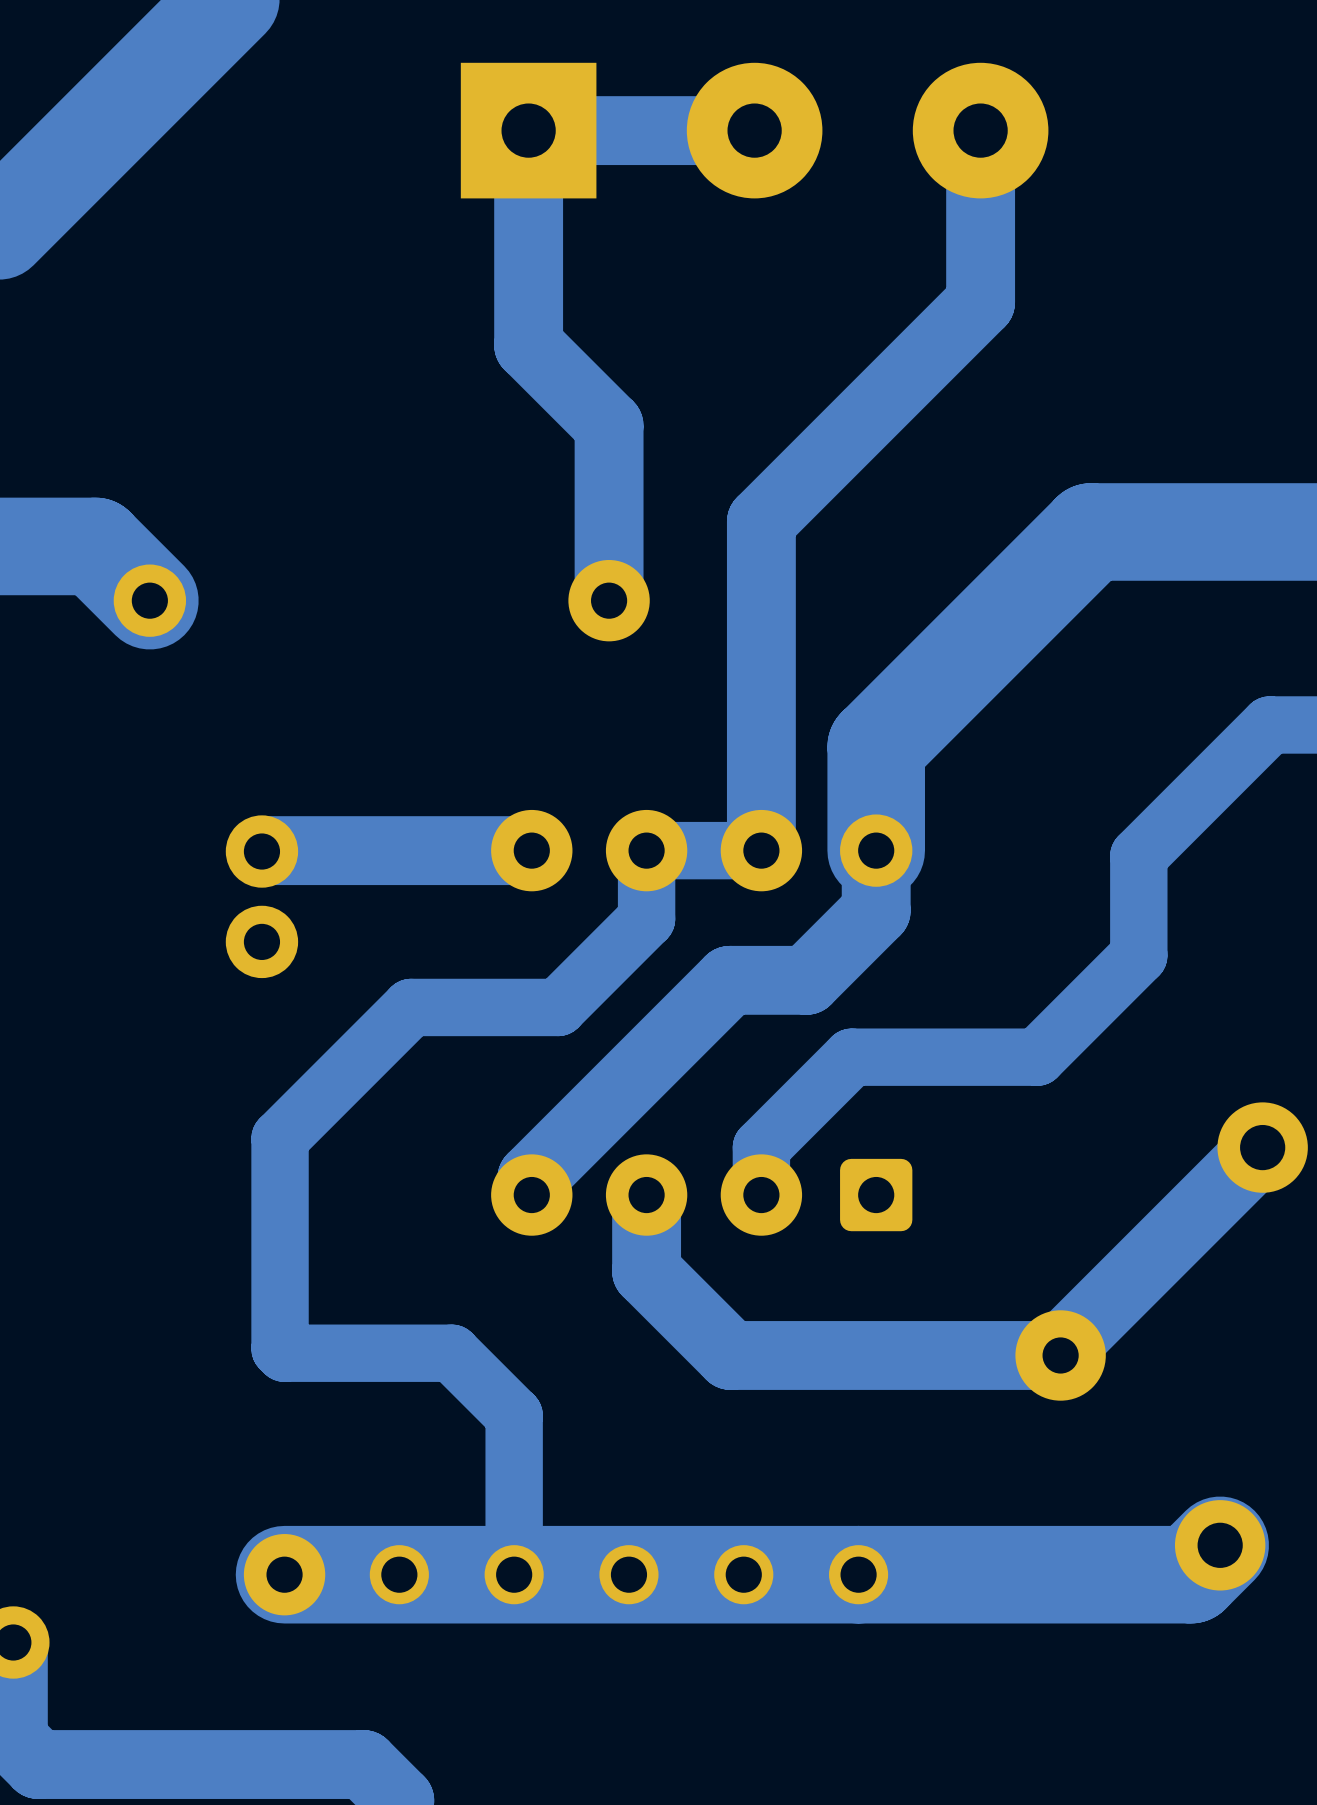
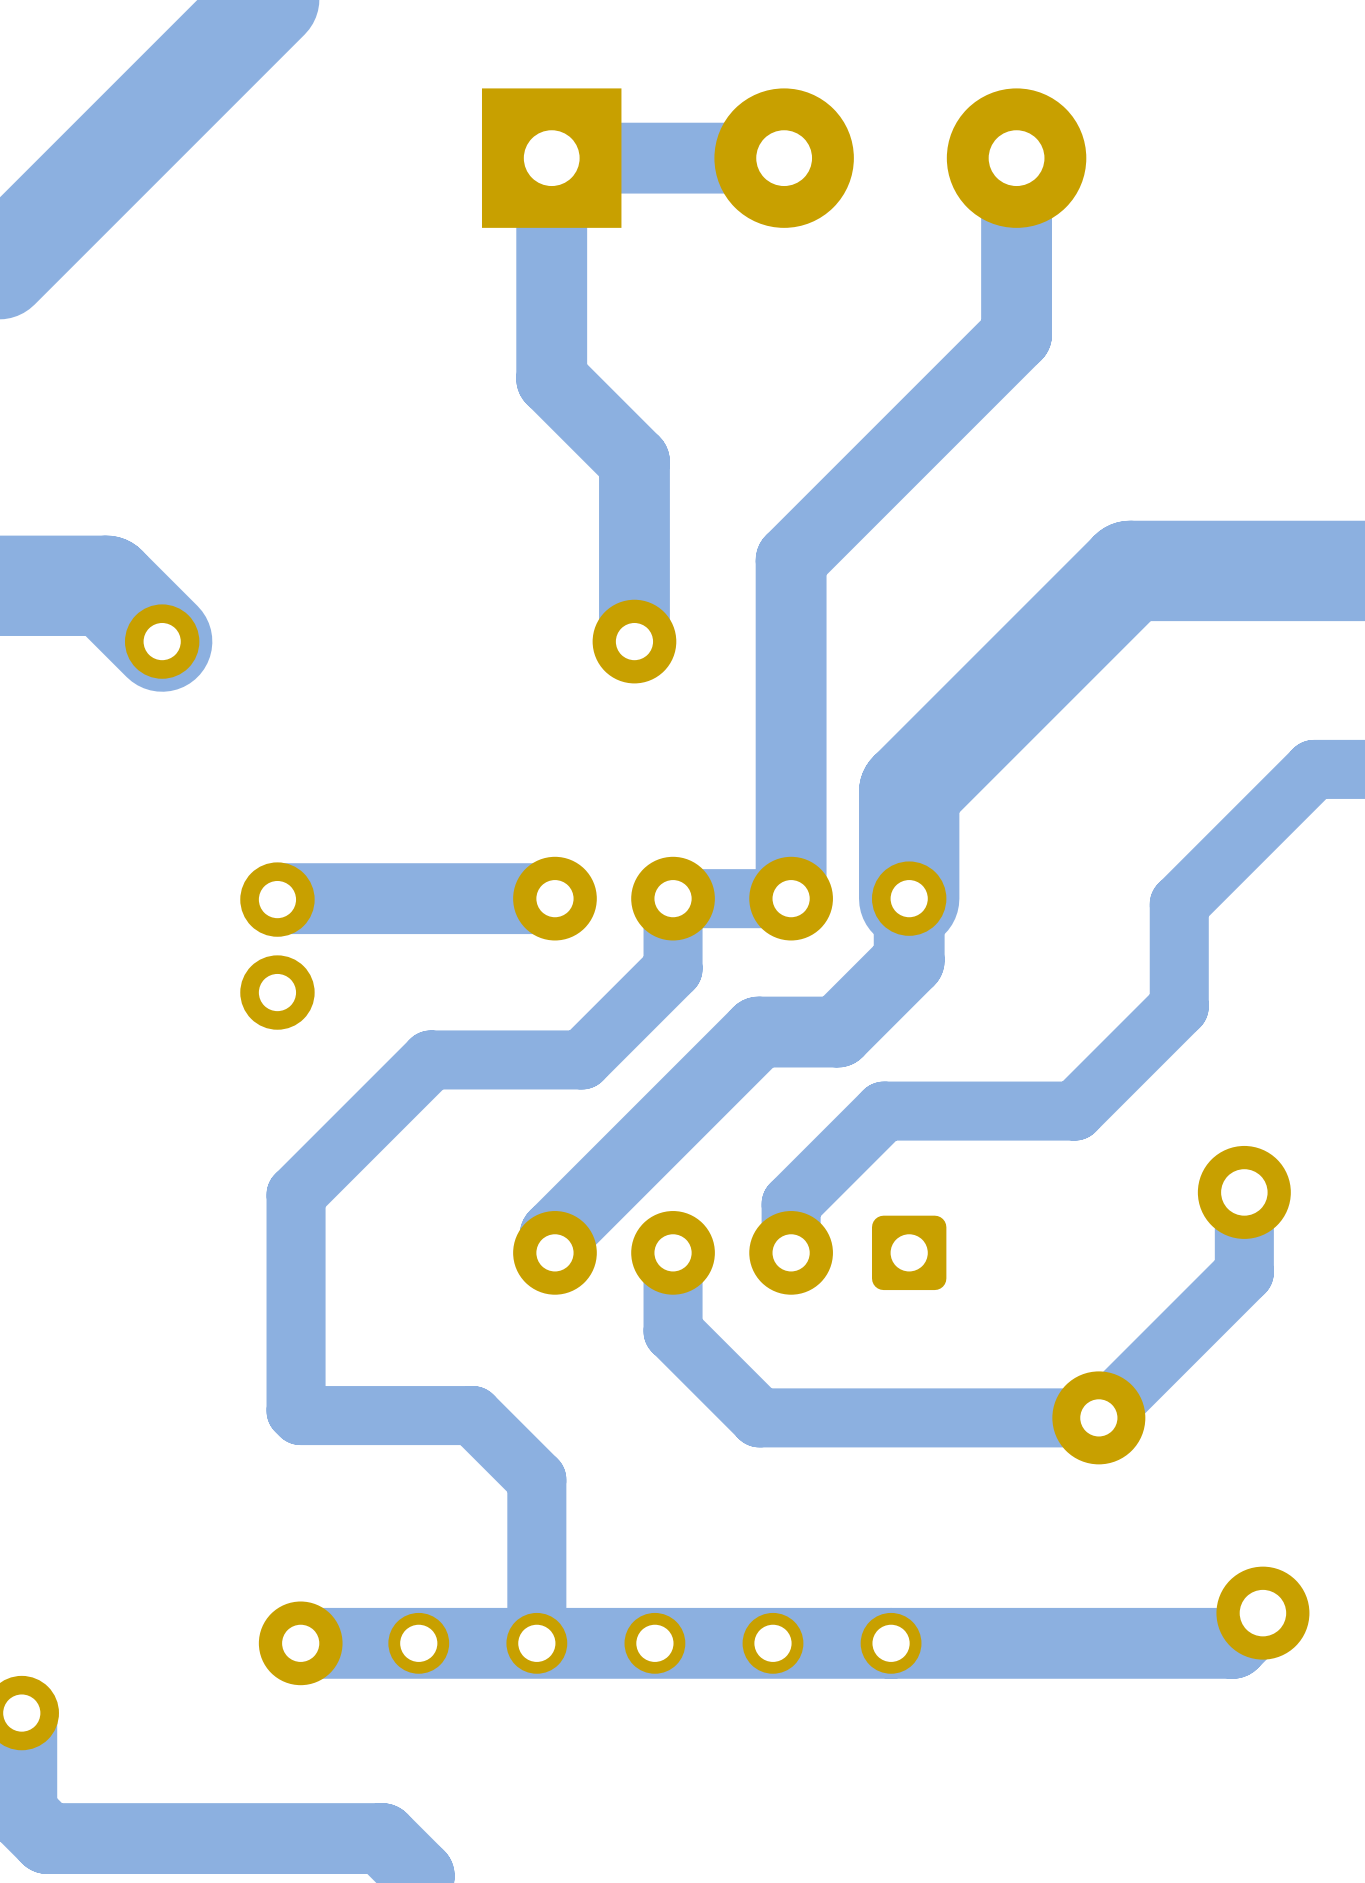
bottom track: (1262, 1147) (1060, 1349) (1060, 1355) -> (1244, 1192) (1244, 1272) (1098, 1417)
part position: (1262, 1147) -> (1244, 1192)
bottom track width: thick (646, 1195) (646, 1271) (730, 1355) (1060, 1355) -> thin (673, 1252) (673, 1331) (759, 1417) (1098, 1417)
bottom track width: thick (1220, 1545) (1190, 1574) (284, 1574) -> thin (1262, 1613) (1232, 1643) (300, 1643)

